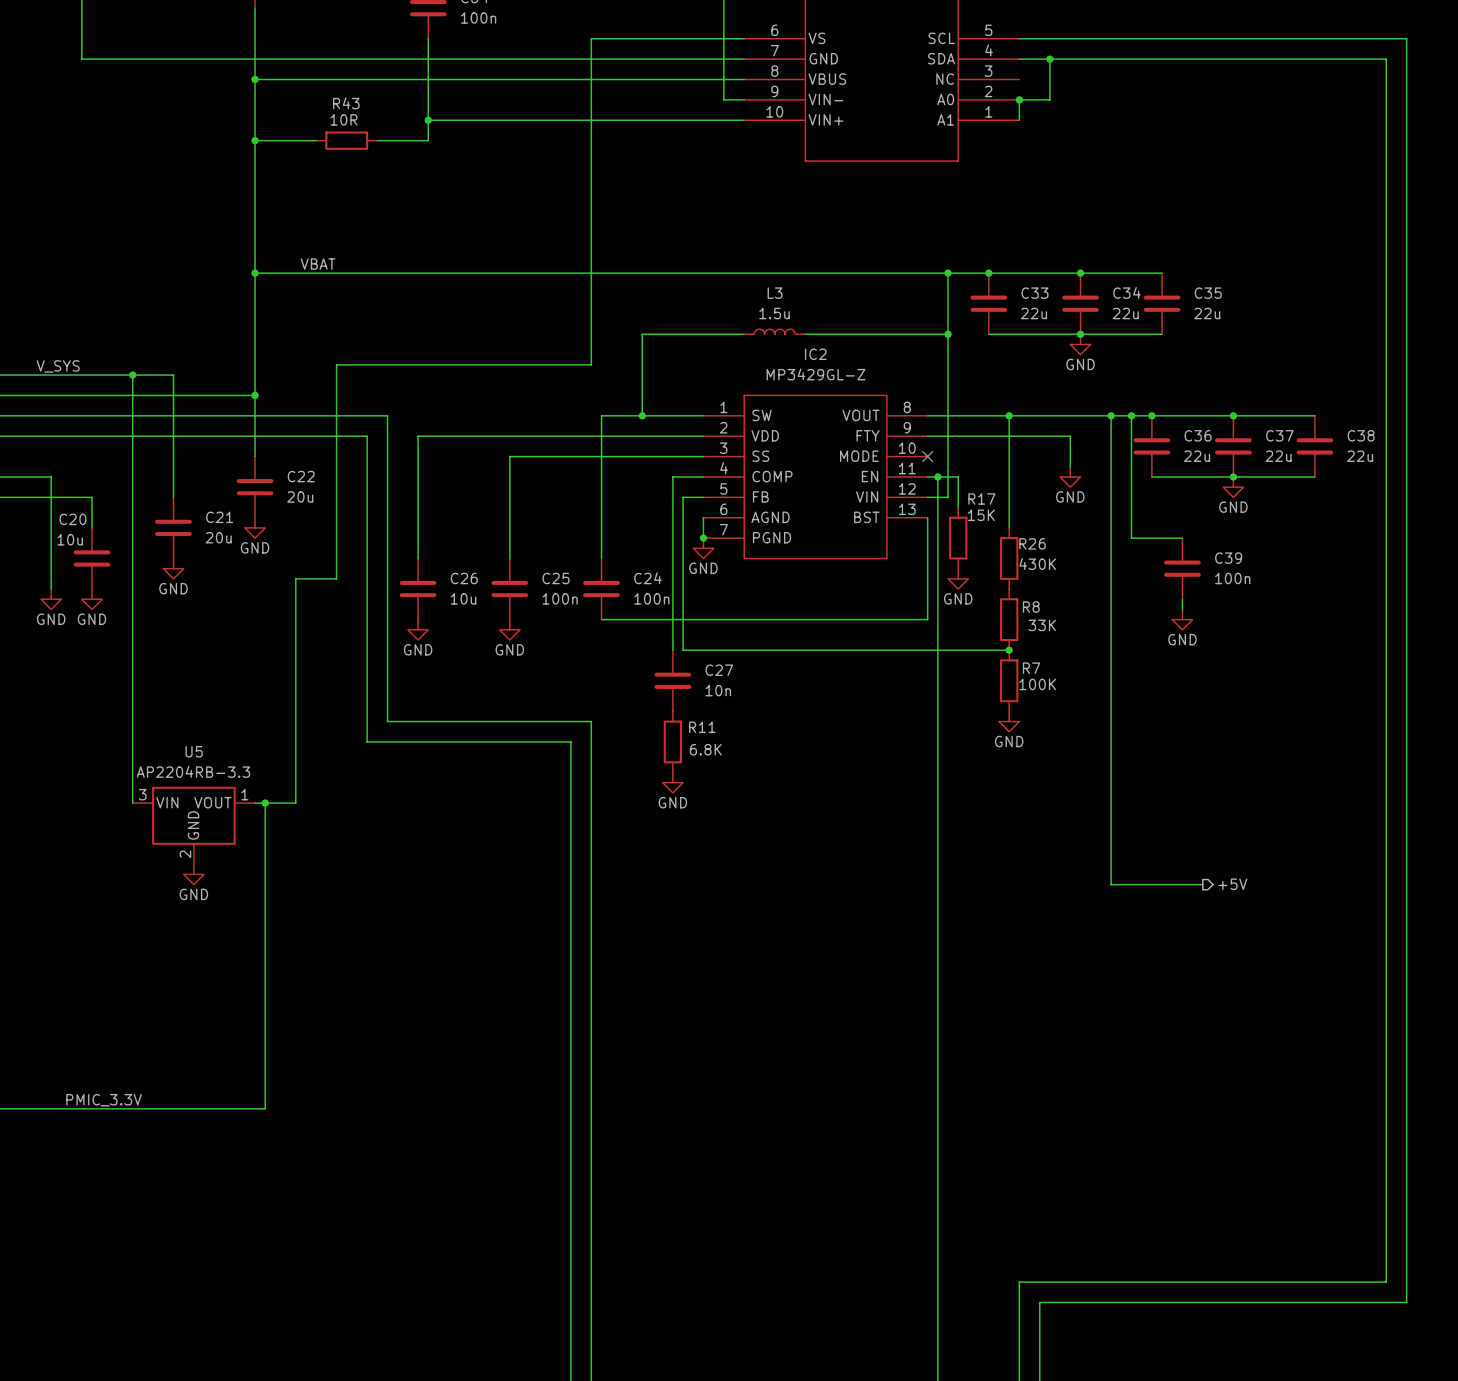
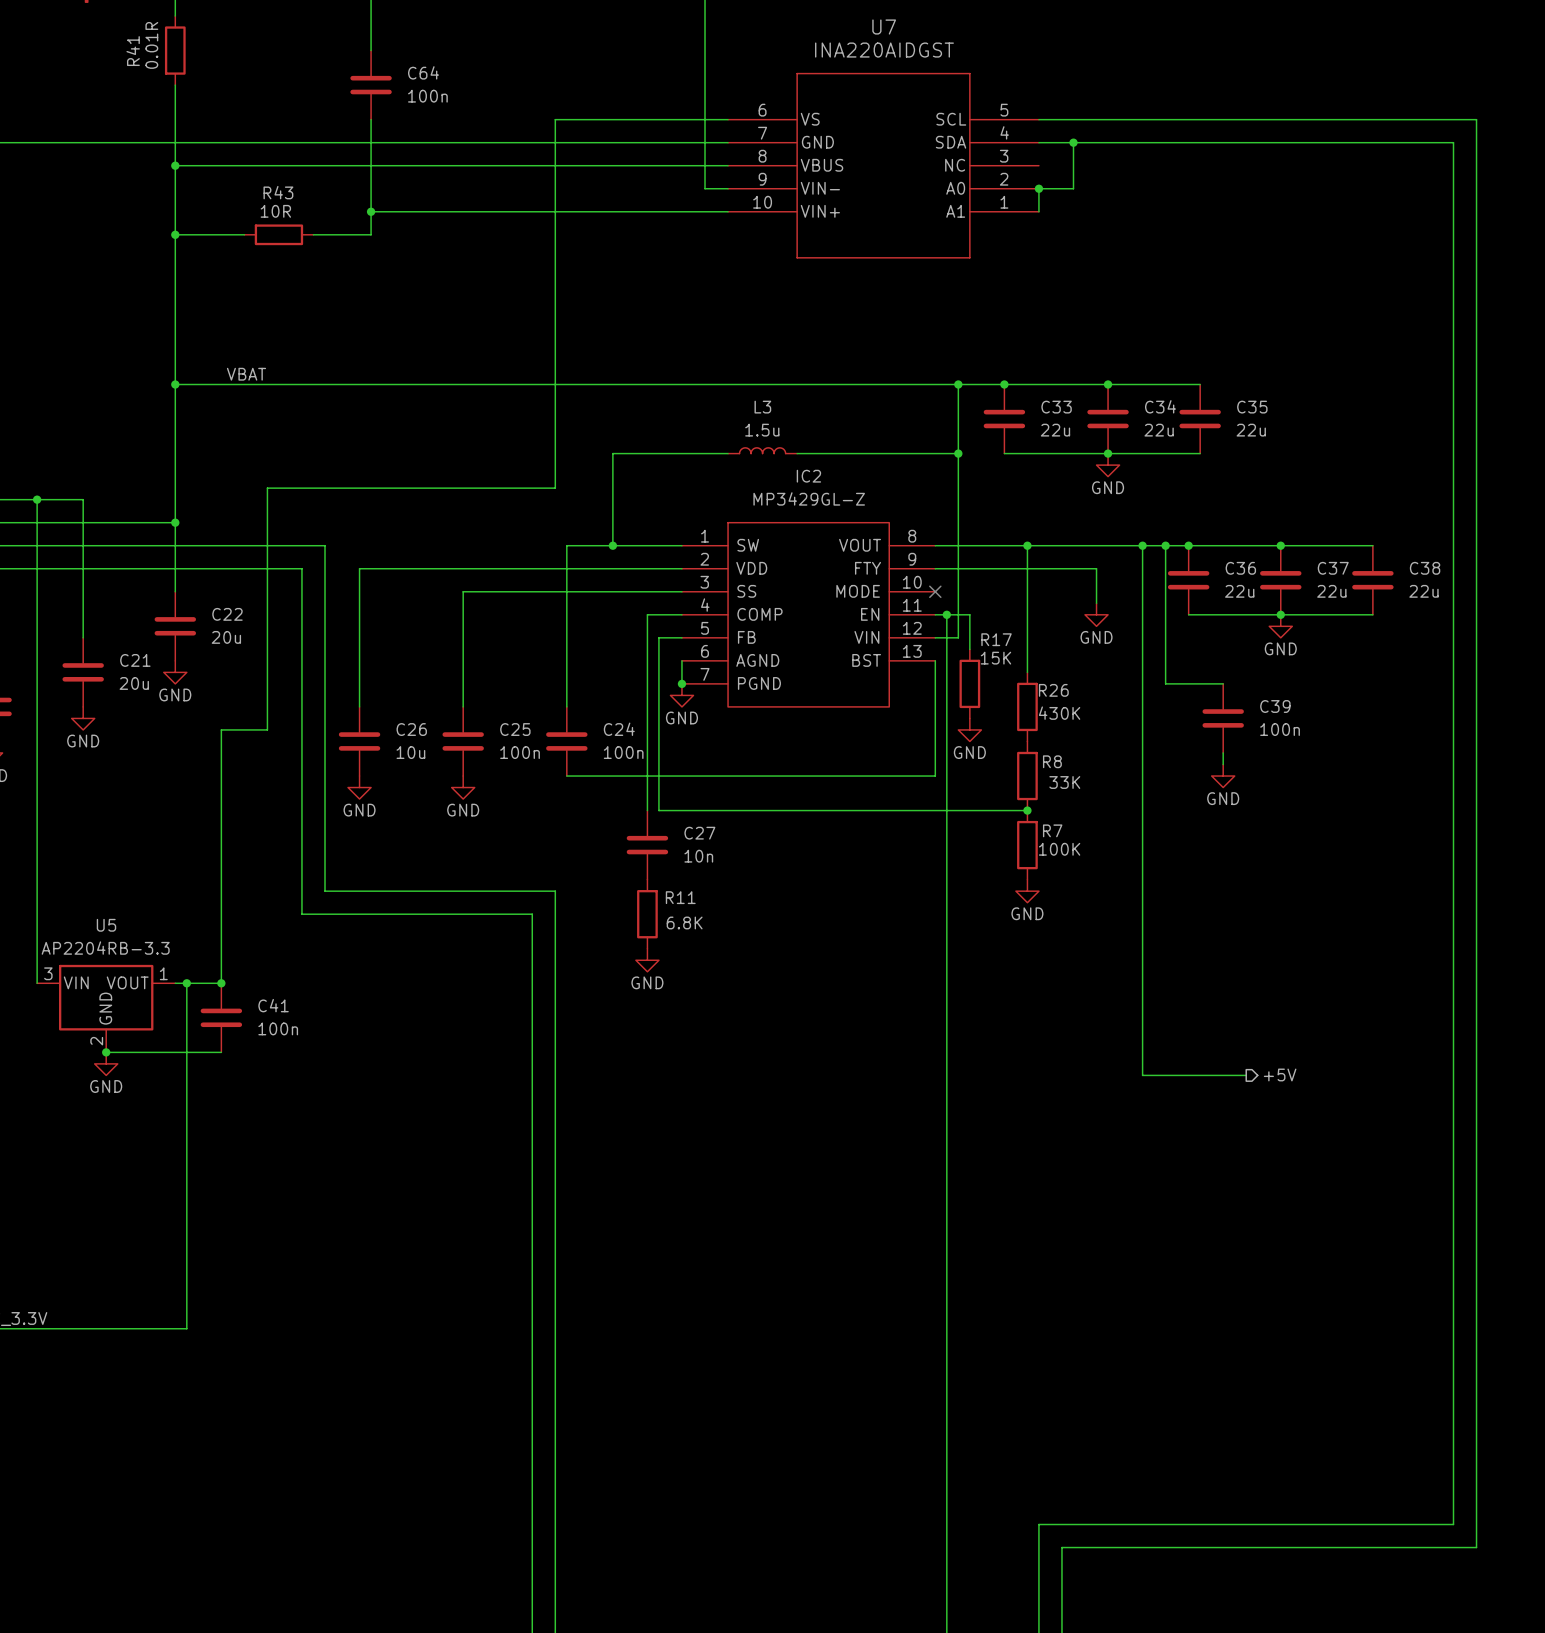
junction: none -> (221, 983)
C41: none -> 100n (221, 1017)
wire: none -> (106, 1052) (221, 1052)
junction: none -> (106, 1052)

